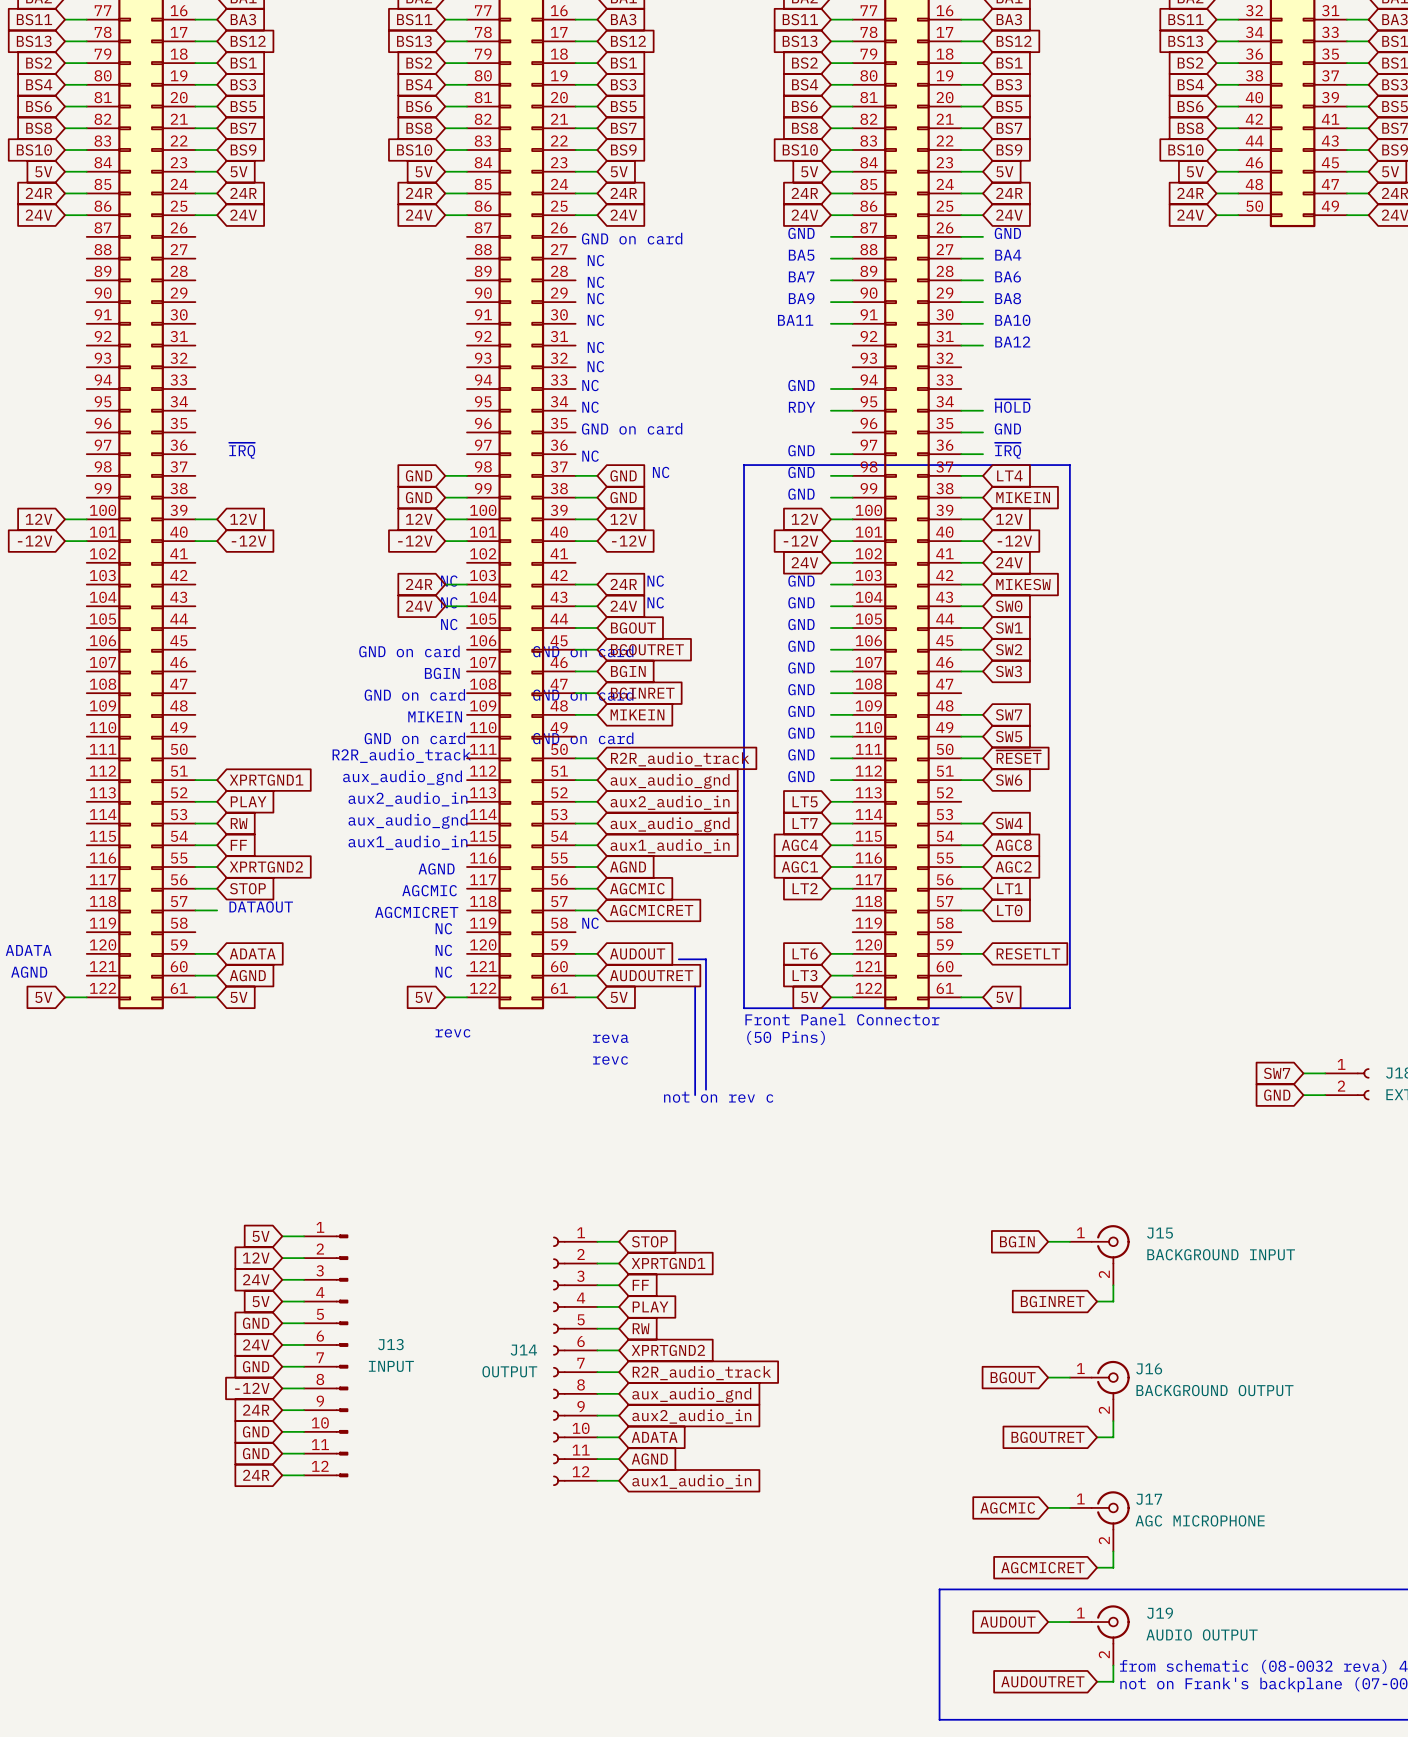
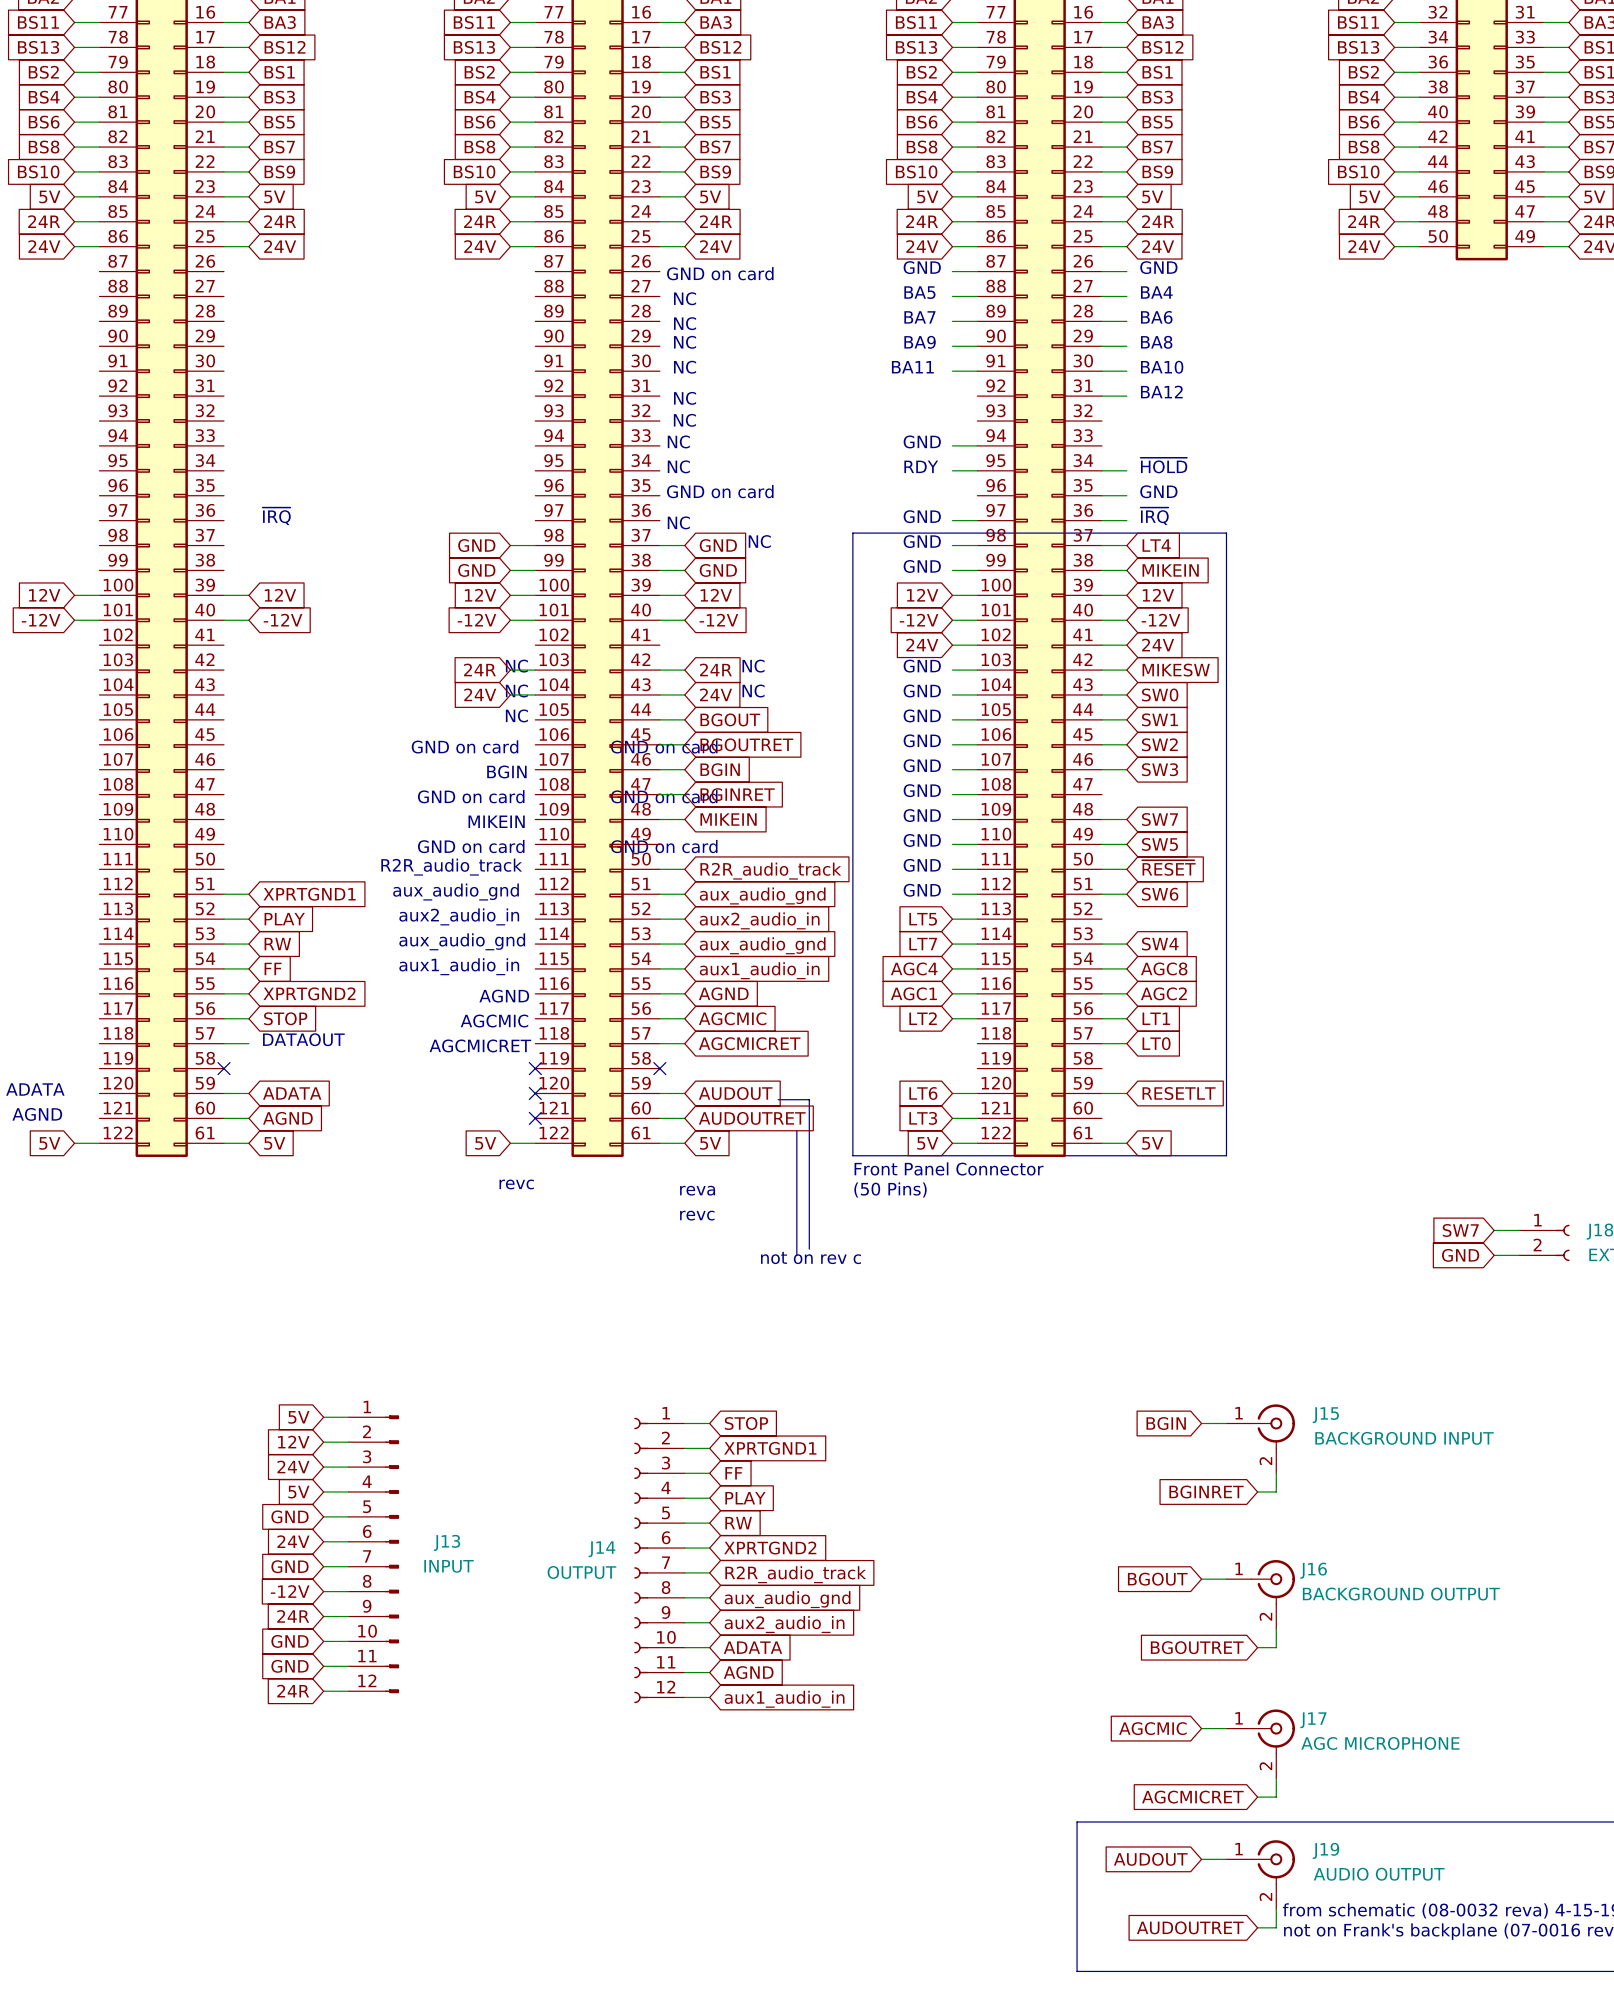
text: NC (590, 923) -> none
text: NC (443, 928) -> none
no-connect mark: none -> (223, 1068)
no-connect mark: none -> (535, 1068)
no-connect mark: none -> (659, 1068)
text: NC (443, 950) -> none
no-connect mark: none -> (535, 1093)
text: NC (443, 972) -> none
no-connect mark: none -> (535, 1118)

